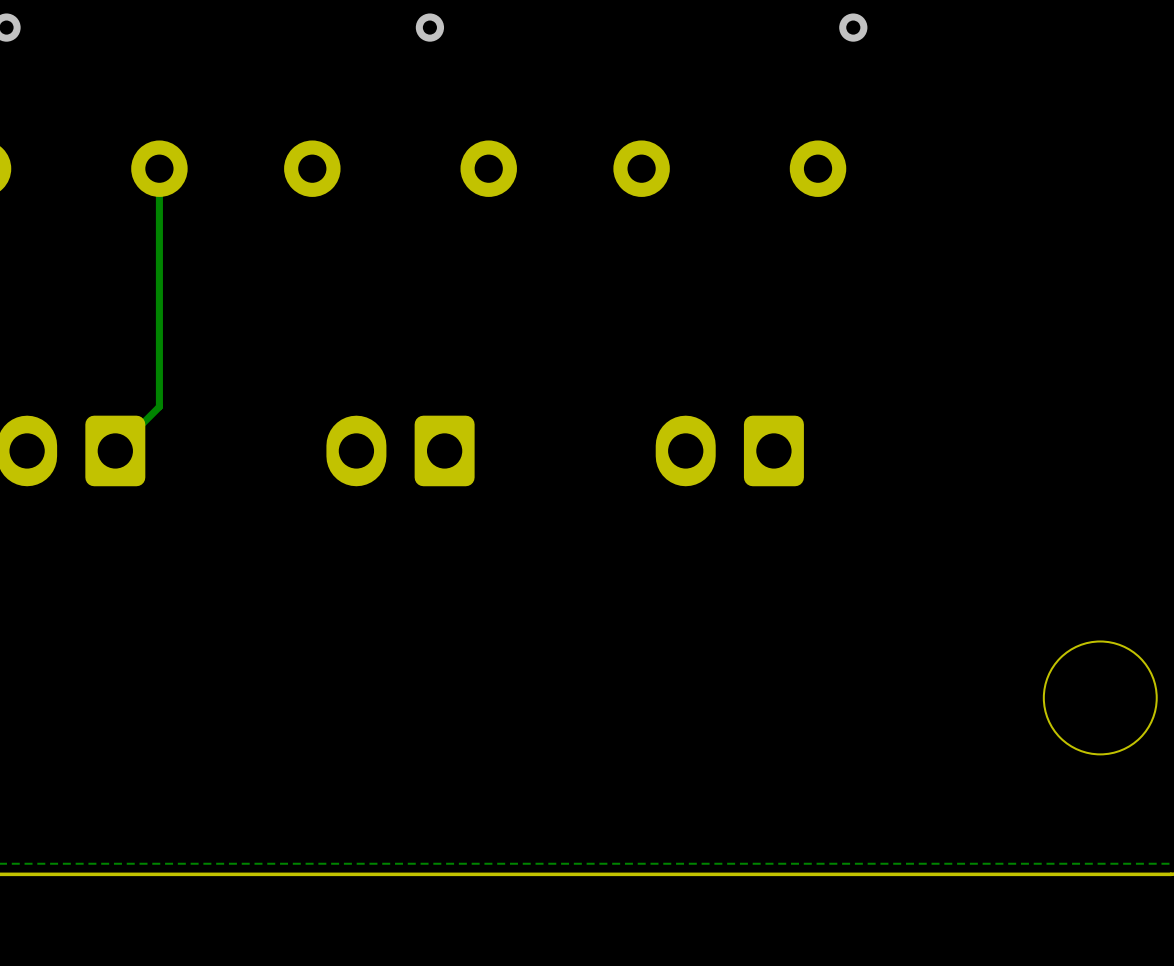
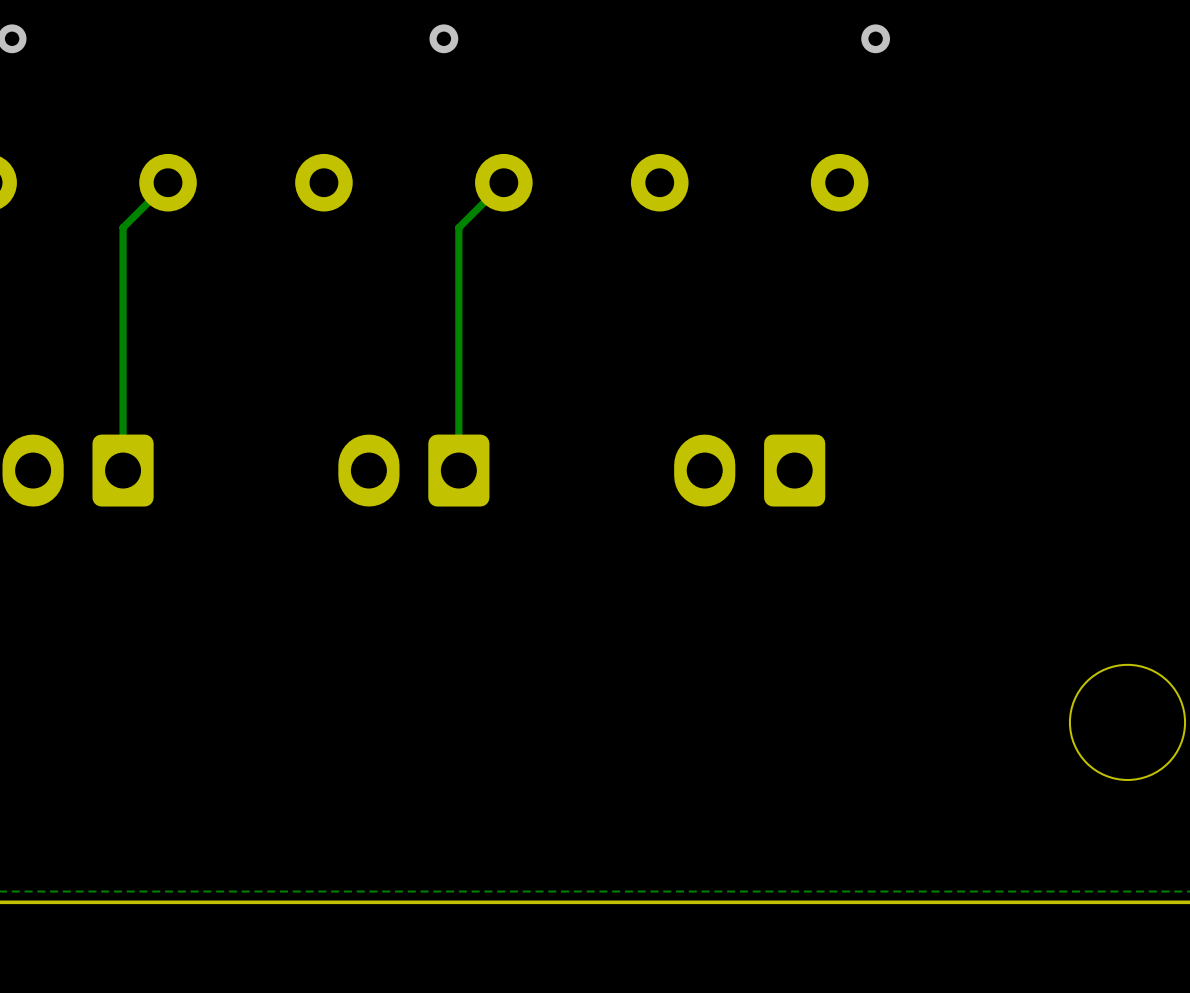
track: (159, 168) (159, 406) (115, 450) -> (168, 182) (123, 227) (123, 470)
track: none -> (503, 182) (458, 227) (458, 470)

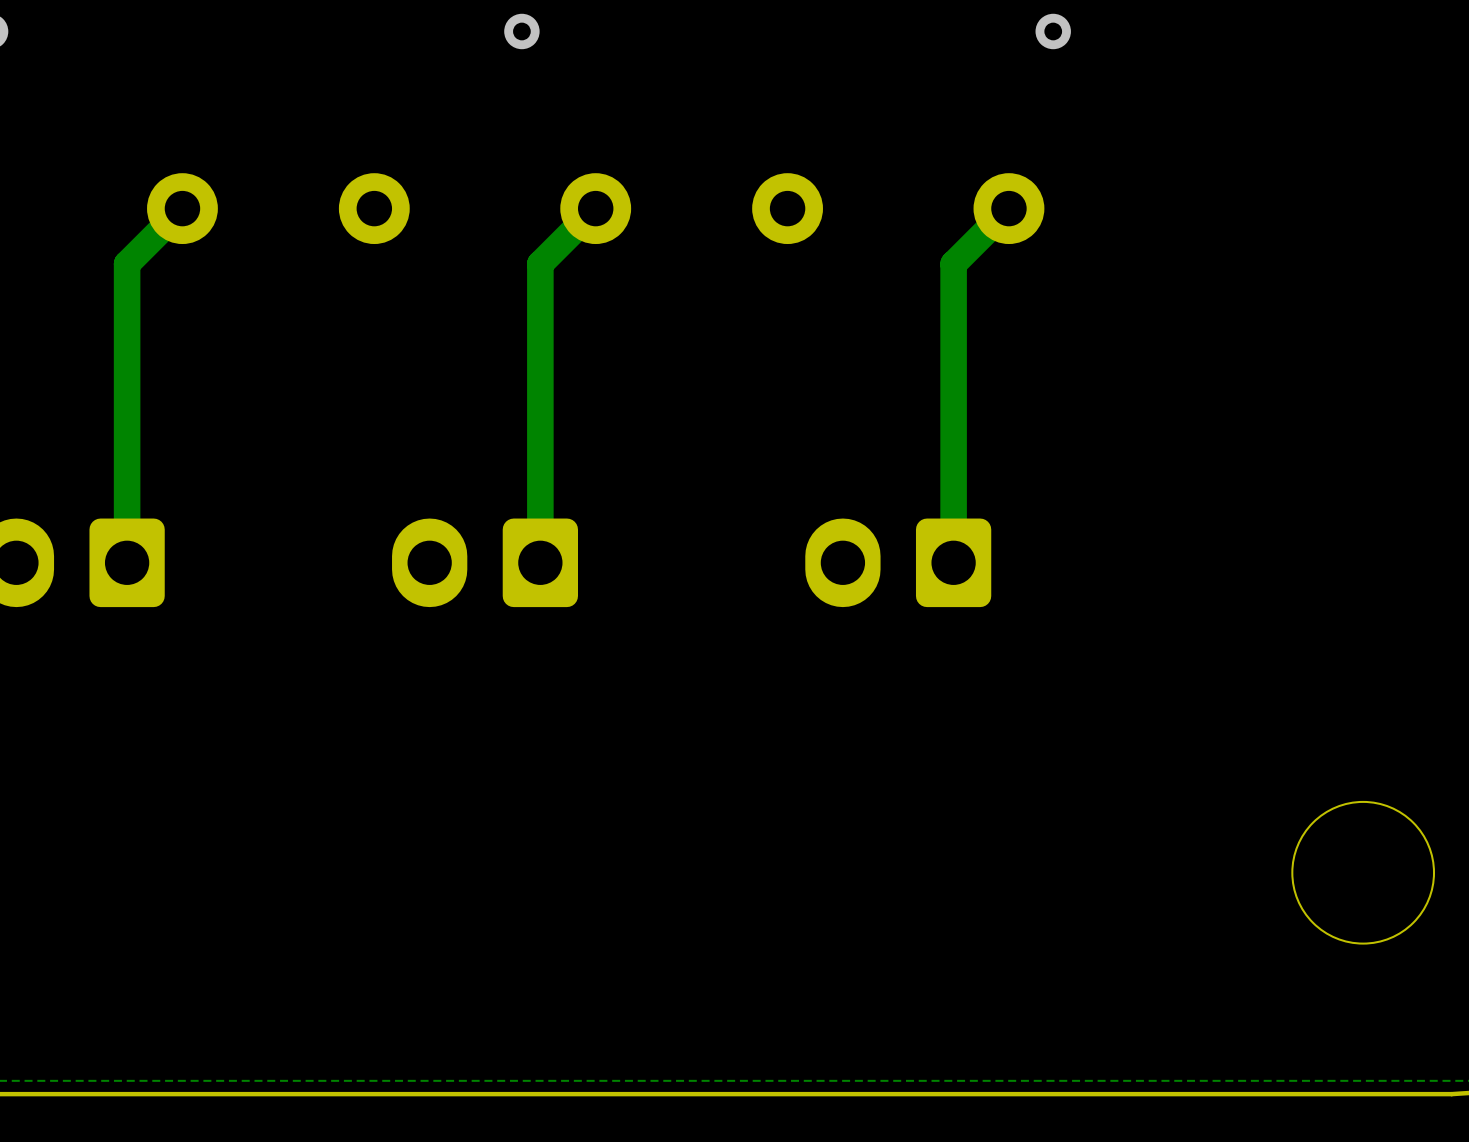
track width: thin (168, 182) (123, 227) (123, 470) -> thick (182, 208) (127, 263) (127, 562)
track width: thin (503, 182) (458, 227) (458, 470) -> thick (595, 208) (540, 263) (540, 562)
track: none -> (1008, 208) (953, 263) (953, 562)

